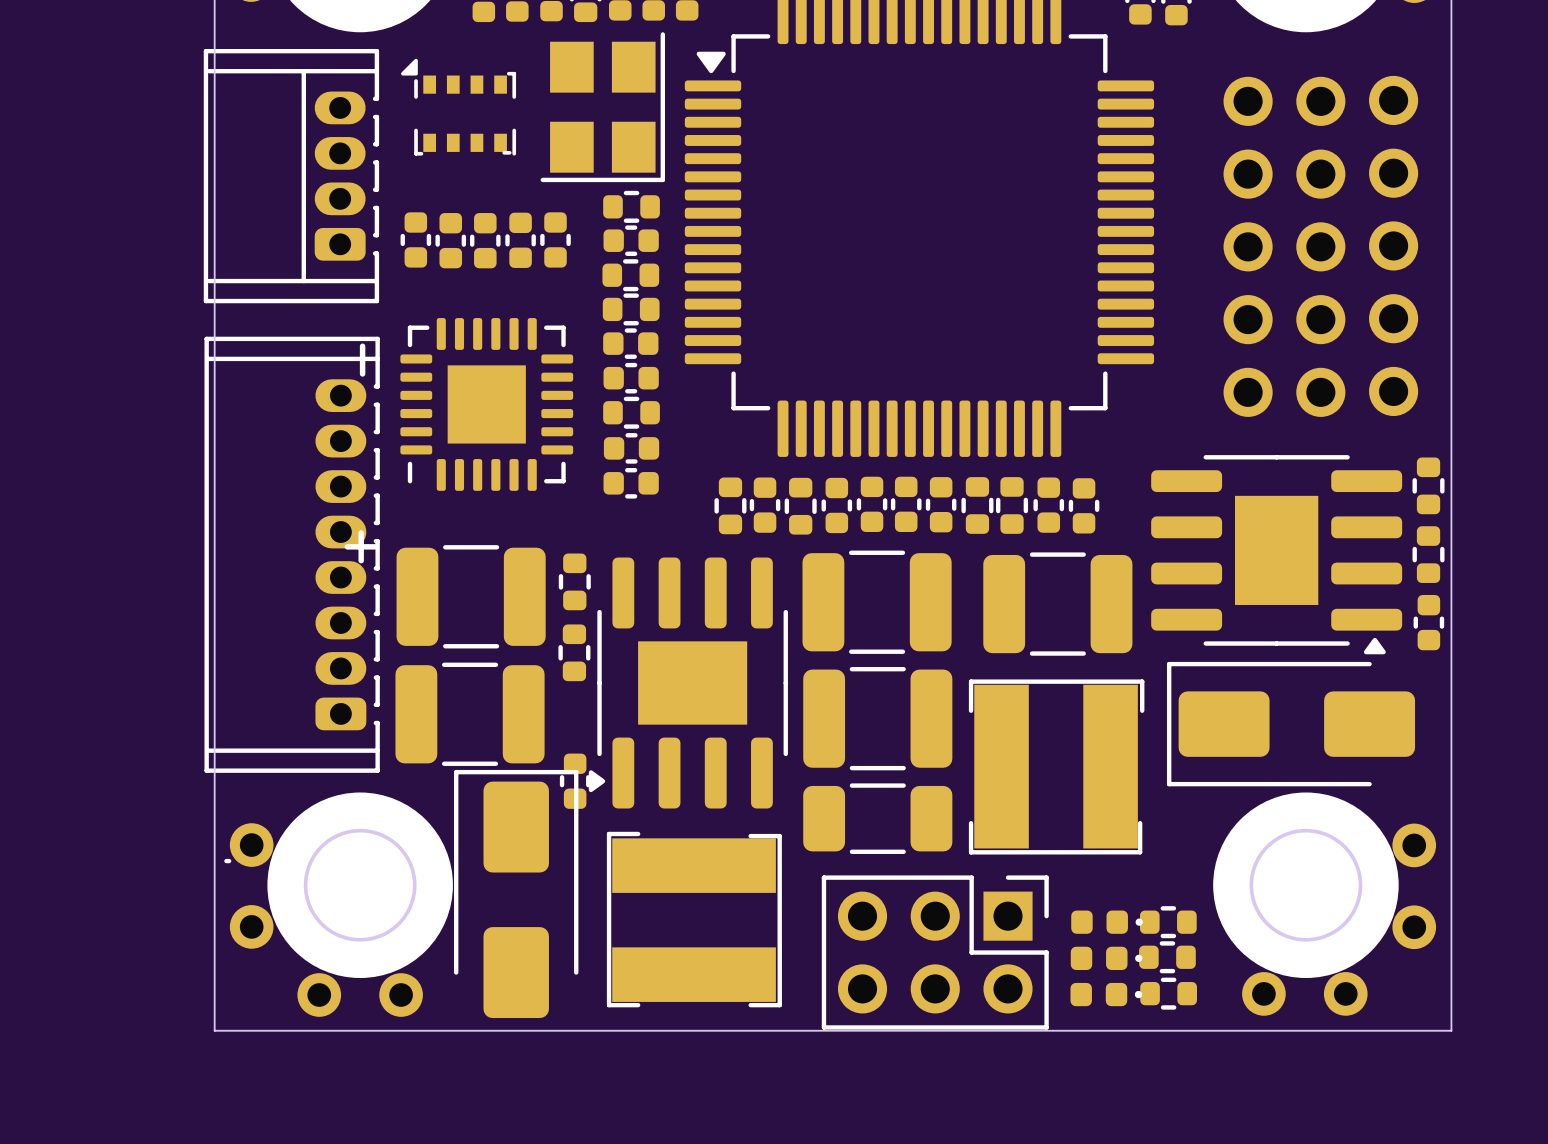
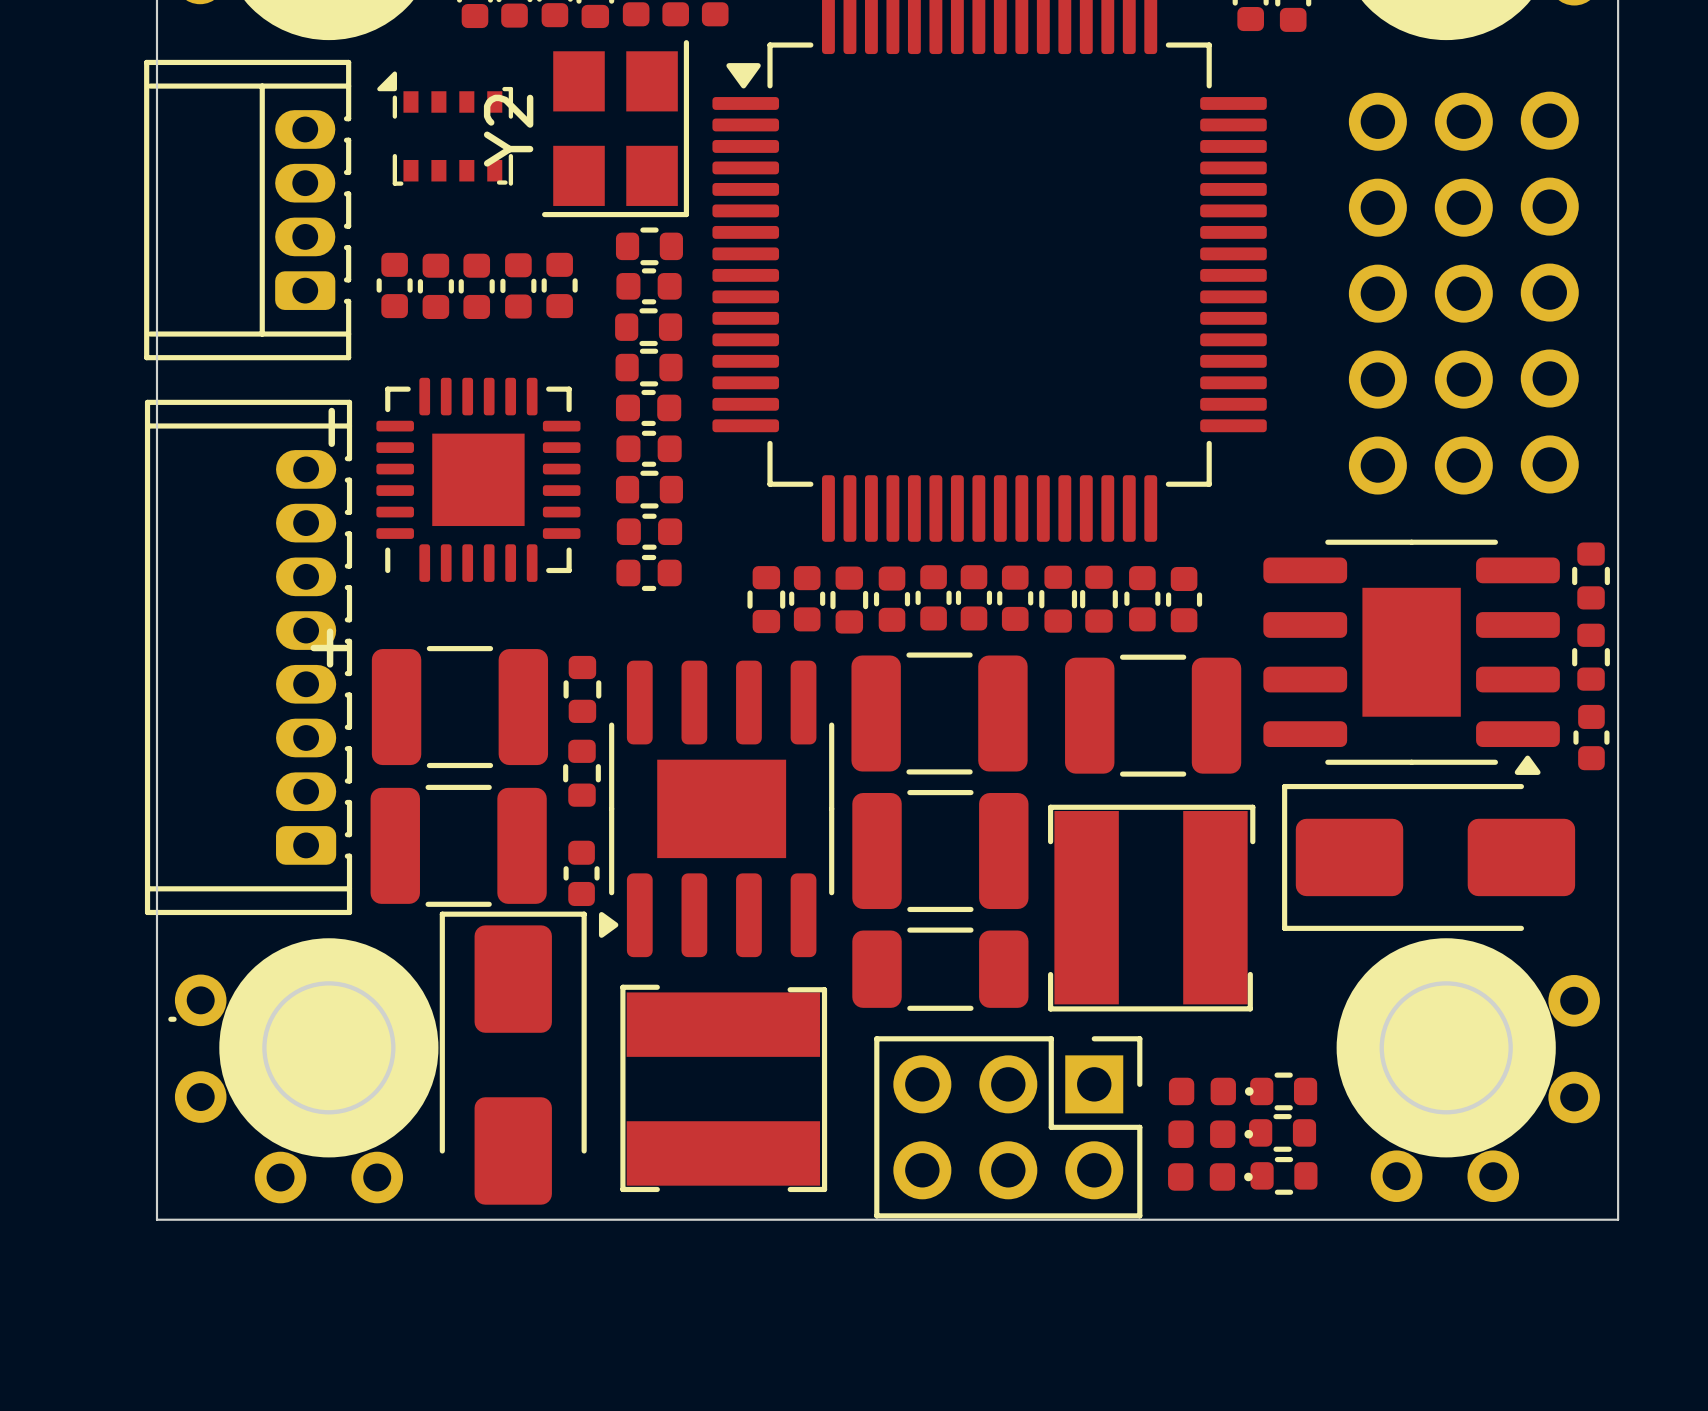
Y2 name: none -> Y2 (508, 130)
part position: (575, 781) -> (581, 873)

